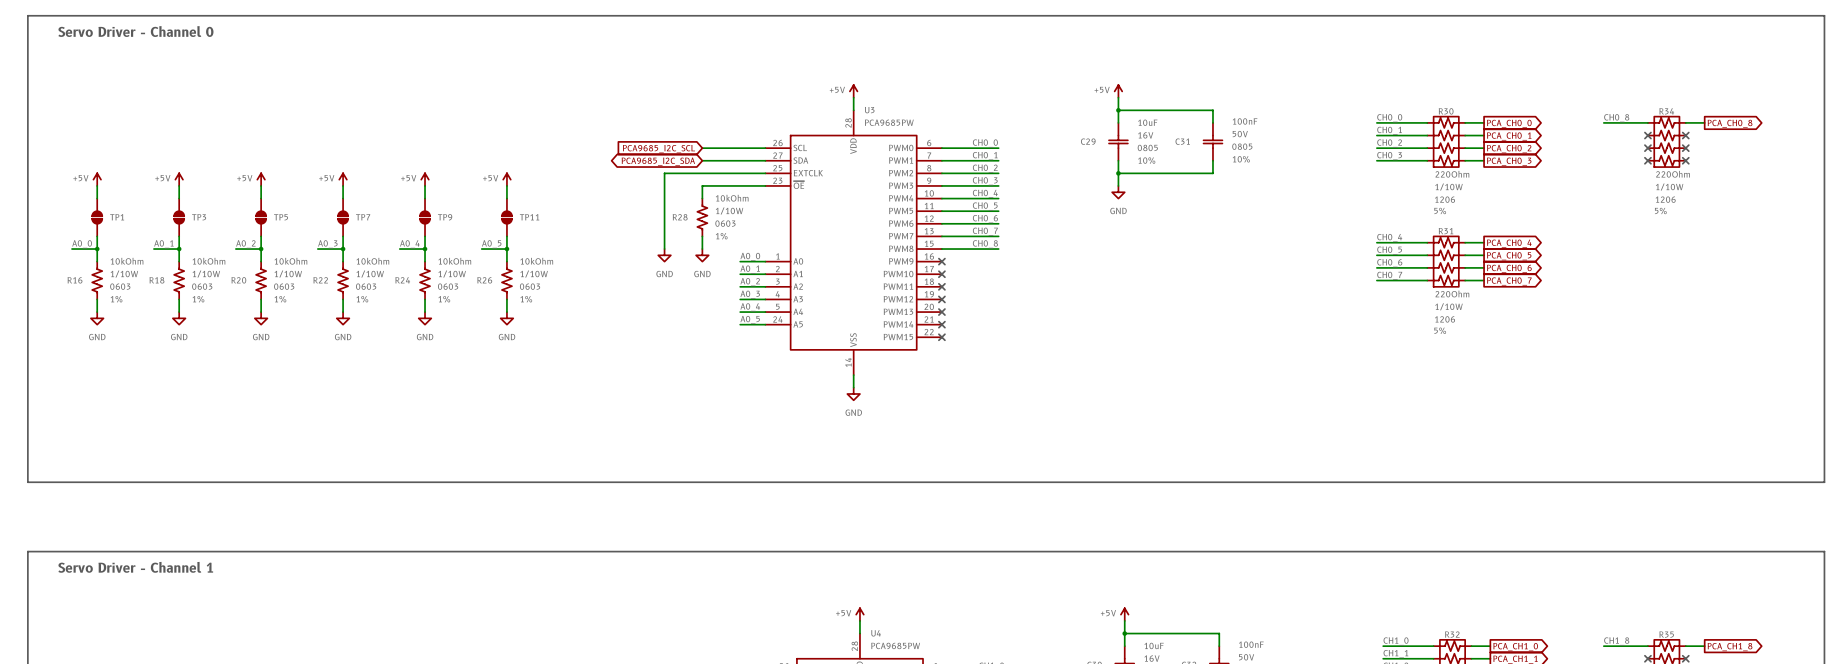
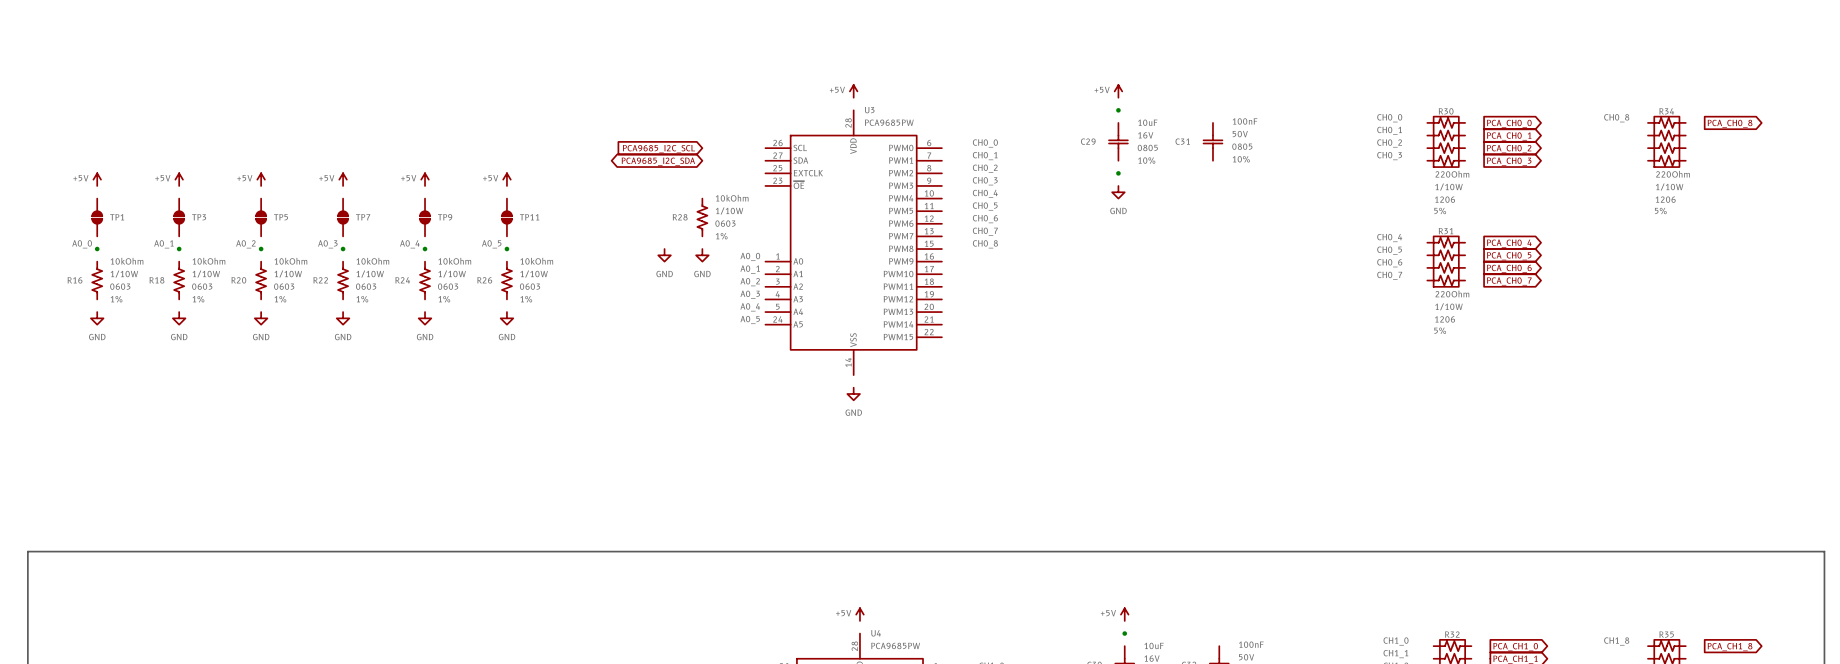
line: (27, 15) (27, 482) (1824, 482) (1824, 15) (27, 15) -> none
text: Servo Driver - Channel 0 (135, 31) -> none
wire: (853, 97) (853, 110) -> none
wire: (1118, 97) (1118, 122) -> none
wire: (1118, 110) (1212, 110) (1212, 122) -> none
wire: (1376, 122) (1427, 122) -> none
wire: (1465, 122) (1484, 122) -> none
wire: (1603, 122) (1647, 122) -> none
wire: (1685, 122) (1704, 122) -> none
wire: (1376, 135) (1427, 135) -> none
wire: (1465, 135) (1484, 135) -> none
no-connect mark: (1647, 135) -> none
no-connect mark: (1685, 135) -> none
wire: (702, 148) (765, 148) -> none
wire: (941, 148) (998, 148) -> none
wire: (1376, 148) (1427, 148) -> none
wire: (1465, 148) (1484, 148) -> none
no-connect mark: (1647, 148) -> none
no-connect mark: (1685, 148) -> none
wire: (702, 160) (765, 160) -> none
wire: (941, 160) (998, 160) -> none
wire: (1118, 160) (1118, 185) -> none
wire: (1212, 160) (1212, 173) (1118, 173) -> none
wire: (1376, 160) (1427, 160) -> none
wire: (1465, 160) (1484, 160) -> none
no-connect mark: (1647, 160) -> none
no-connect mark: (1685, 160) -> none
wire: (765, 173) (664, 173) (664, 249) -> none
wire: (941, 173) (998, 173) -> none
wire: (97, 185) (97, 198) -> none
wire: (179, 185) (179, 198) -> none
wire: (261, 185) (261, 198) -> none
wire: (343, 185) (343, 198) -> none
wire: (425, 185) (425, 198) -> none
wire: (506, 185) (506, 198) -> none
wire: (765, 185) (702, 185) (702, 198) -> none
wire: (941, 185) (998, 185) -> none
wire: (941, 198) (998, 198) -> none
wire: (941, 211) (998, 211) -> none
wire: (941, 223) (998, 223) -> none
wire: (97, 236) (97, 261) -> none
wire: (179, 236) (179, 261) -> none
wire: (261, 236) (261, 261) -> none
wire: (343, 236) (343, 261) -> none
wire: (425, 236) (425, 261) -> none
wire: (506, 236) (506, 261) -> none
wire: (702, 236) (702, 249) -> none
wire: (941, 236) (998, 236) -> none
wire: (1376, 242) (1427, 242) -> none
wire: (1465, 242) (1484, 242) -> none
wire: (72, 249) (97, 249) -> none
wire: (153, 249) (179, 249) -> none
wire: (235, 249) (261, 249) -> none
wire: (317, 249) (343, 249) -> none
wire: (399, 249) (425, 249) -> none
wire: (481, 249) (506, 249) -> none
wire: (941, 249) (998, 249) -> none
wire: (1376, 255) (1427, 255) -> none
wire: (1465, 255) (1484, 255) -> none
wire: (740, 261) (765, 261) -> none
no-connect mark: (941, 261) -> none
wire: (1376, 267) (1427, 267) -> none
wire: (1465, 267) (1484, 267) -> none
wire: (740, 274) (765, 274) -> none
no-connect mark: (941, 274) -> none
wire: (1376, 280) (1427, 280) -> none
wire: (1465, 280) (1484, 280) -> none
wire: (740, 286) (765, 286) -> none
no-connect mark: (941, 286) -> none
wire: (97, 299) (97, 312) -> none
wire: (179, 299) (179, 312) -> none
wire: (261, 299) (261, 312) -> none
wire: (343, 299) (343, 312) -> none
wire: (425, 299) (425, 312) -> none
wire: (506, 299) (506, 312) -> none
wire: (740, 299) (765, 299) -> none
no-connect mark: (941, 299) -> none
wire: (740, 312) (765, 312) -> none
no-connect mark: (941, 312) -> none
wire: (740, 324) (765, 324) -> none
no-connect mark: (941, 324) -> none
no-connect mark: (941, 337) -> none
wire: (853, 375) (853, 387) -> none
text: Servo Driver - Channel 1 (135, 567) -> none
wire: (859, 620) (859, 633) -> none
wire: (1124, 620) (1124, 646) -> none
wire: (1124, 633) (1219, 633) (1219, 646) -> none
wire: (1383, 646) (1433, 646) -> none
wire: (1471, 646) (1490, 646) -> none
wire: (1603, 646) (1647, 646) -> none
wire: (1685, 646) (1704, 646) -> none
wire: (1383, 658) (1433, 658) -> none
wire: (1471, 658) (1490, 658) -> none
no-connect mark: (1647, 658) -> none
no-connect mark: (1685, 658) -> none

